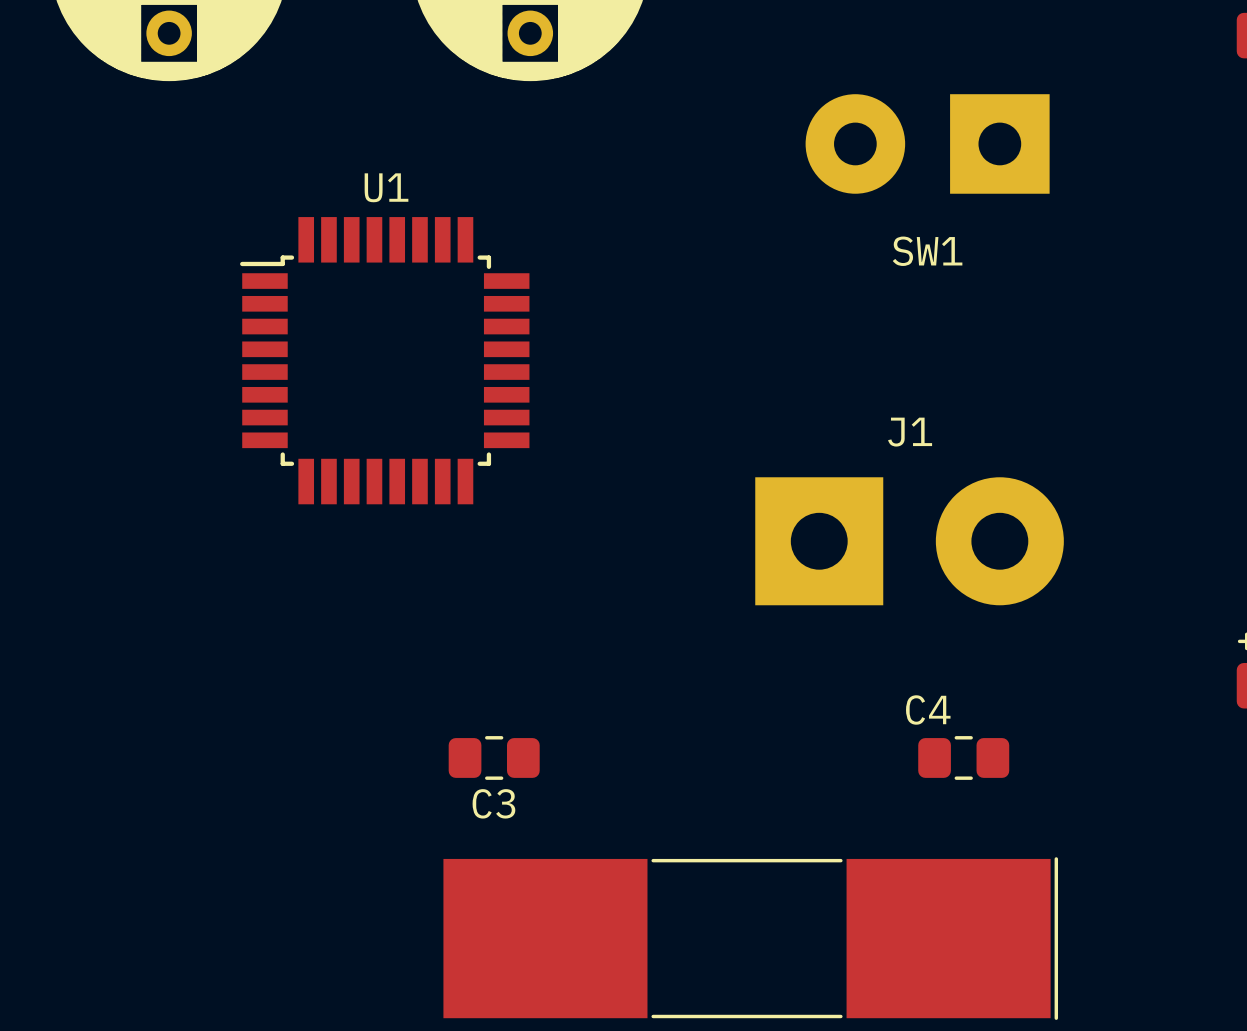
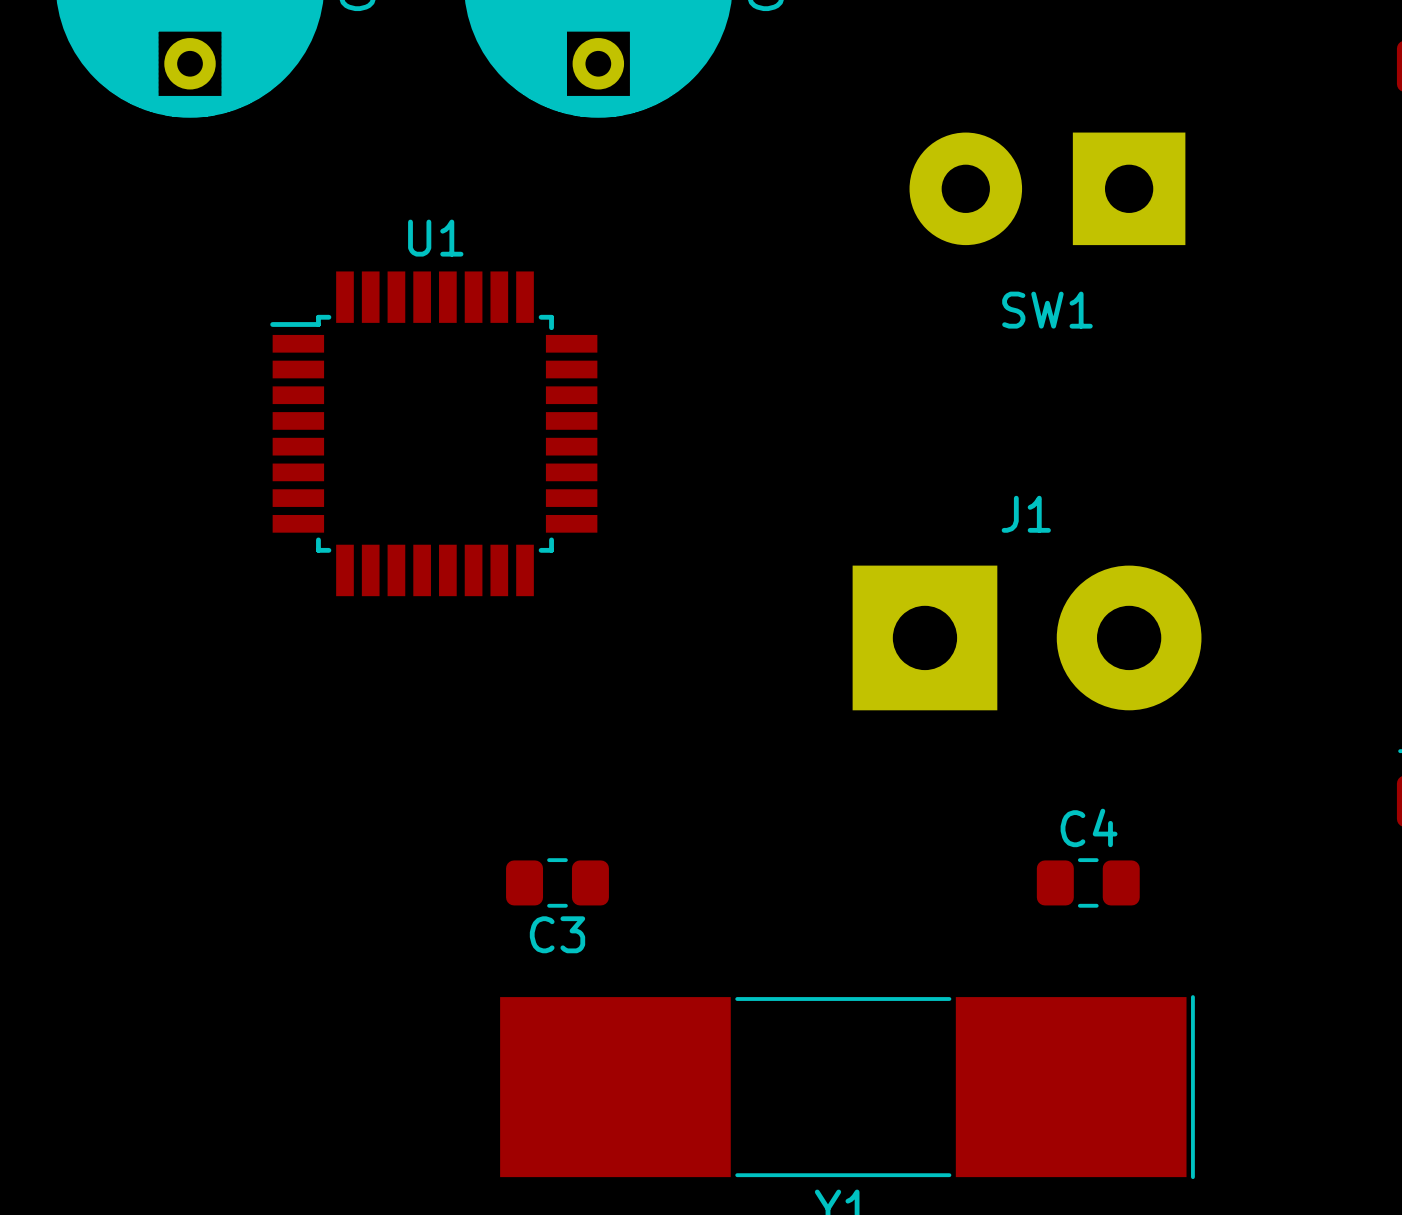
C4 name position: C4 (928, 709) -> C4 (1089, 827)

